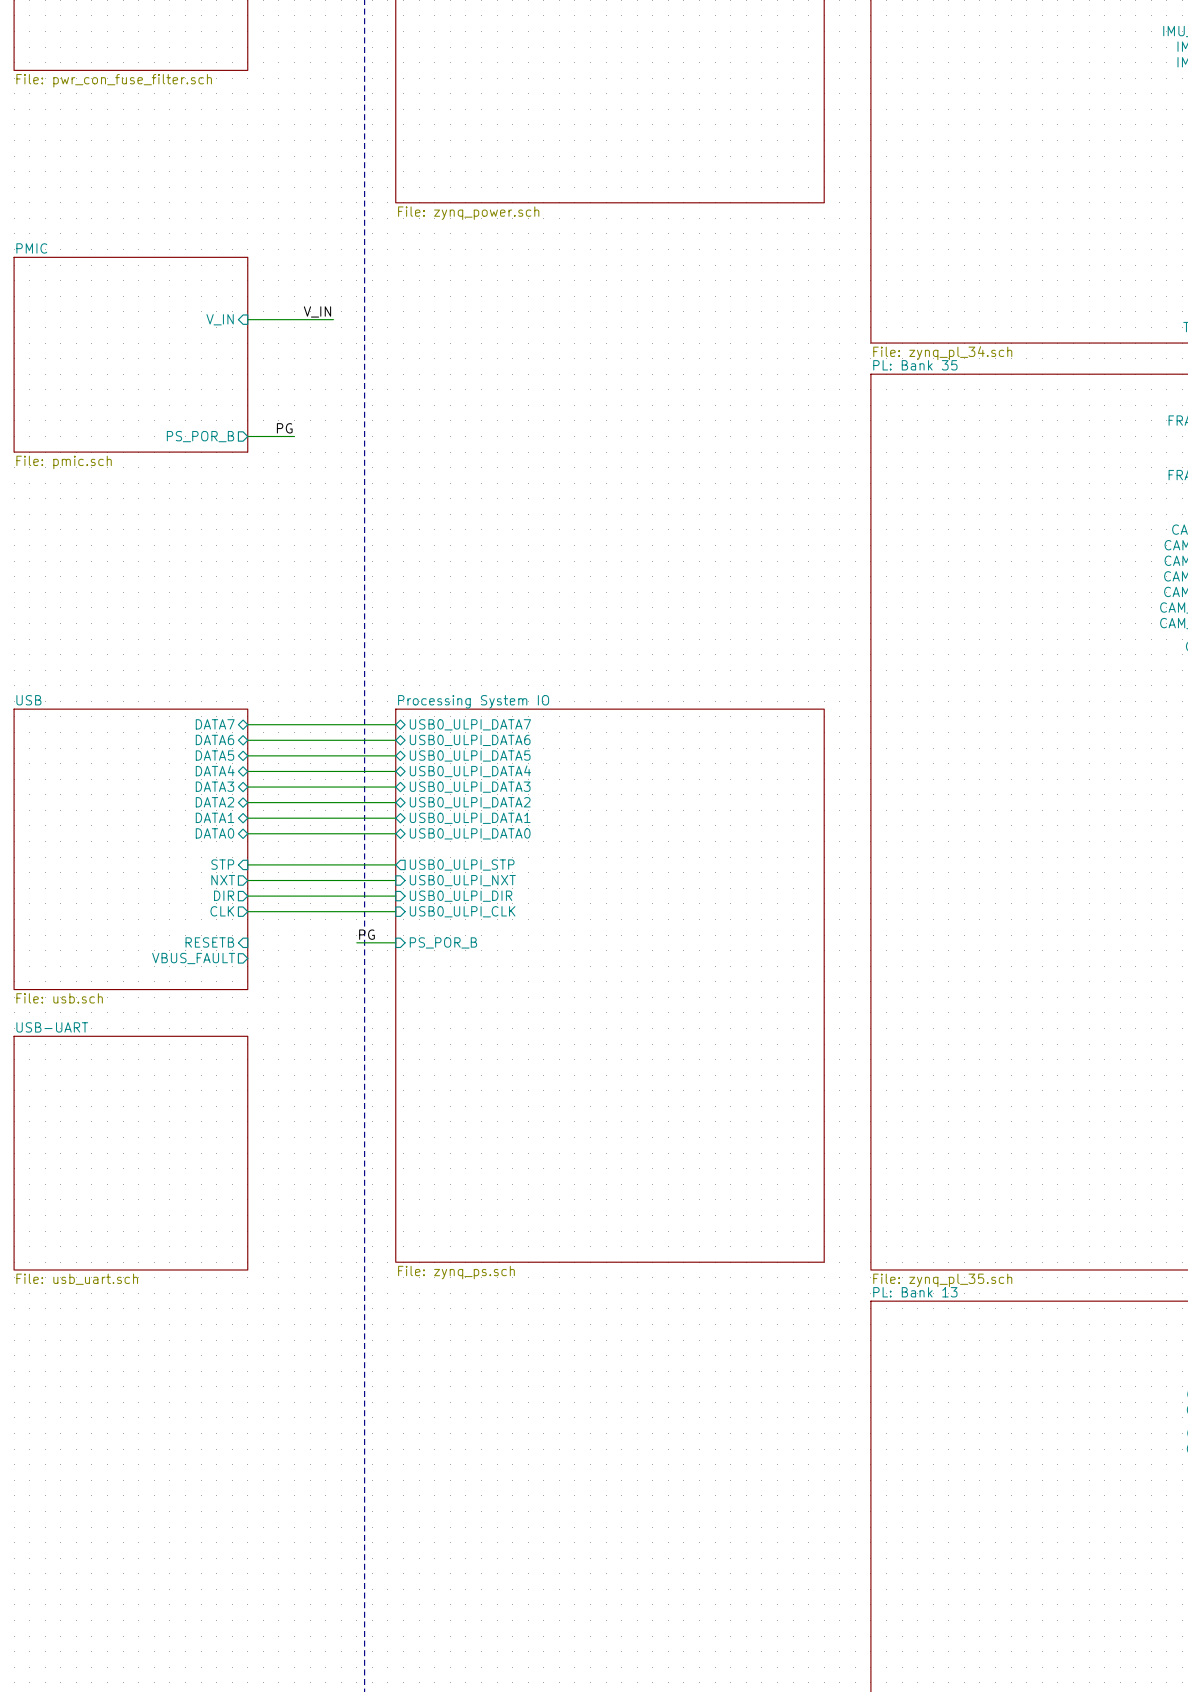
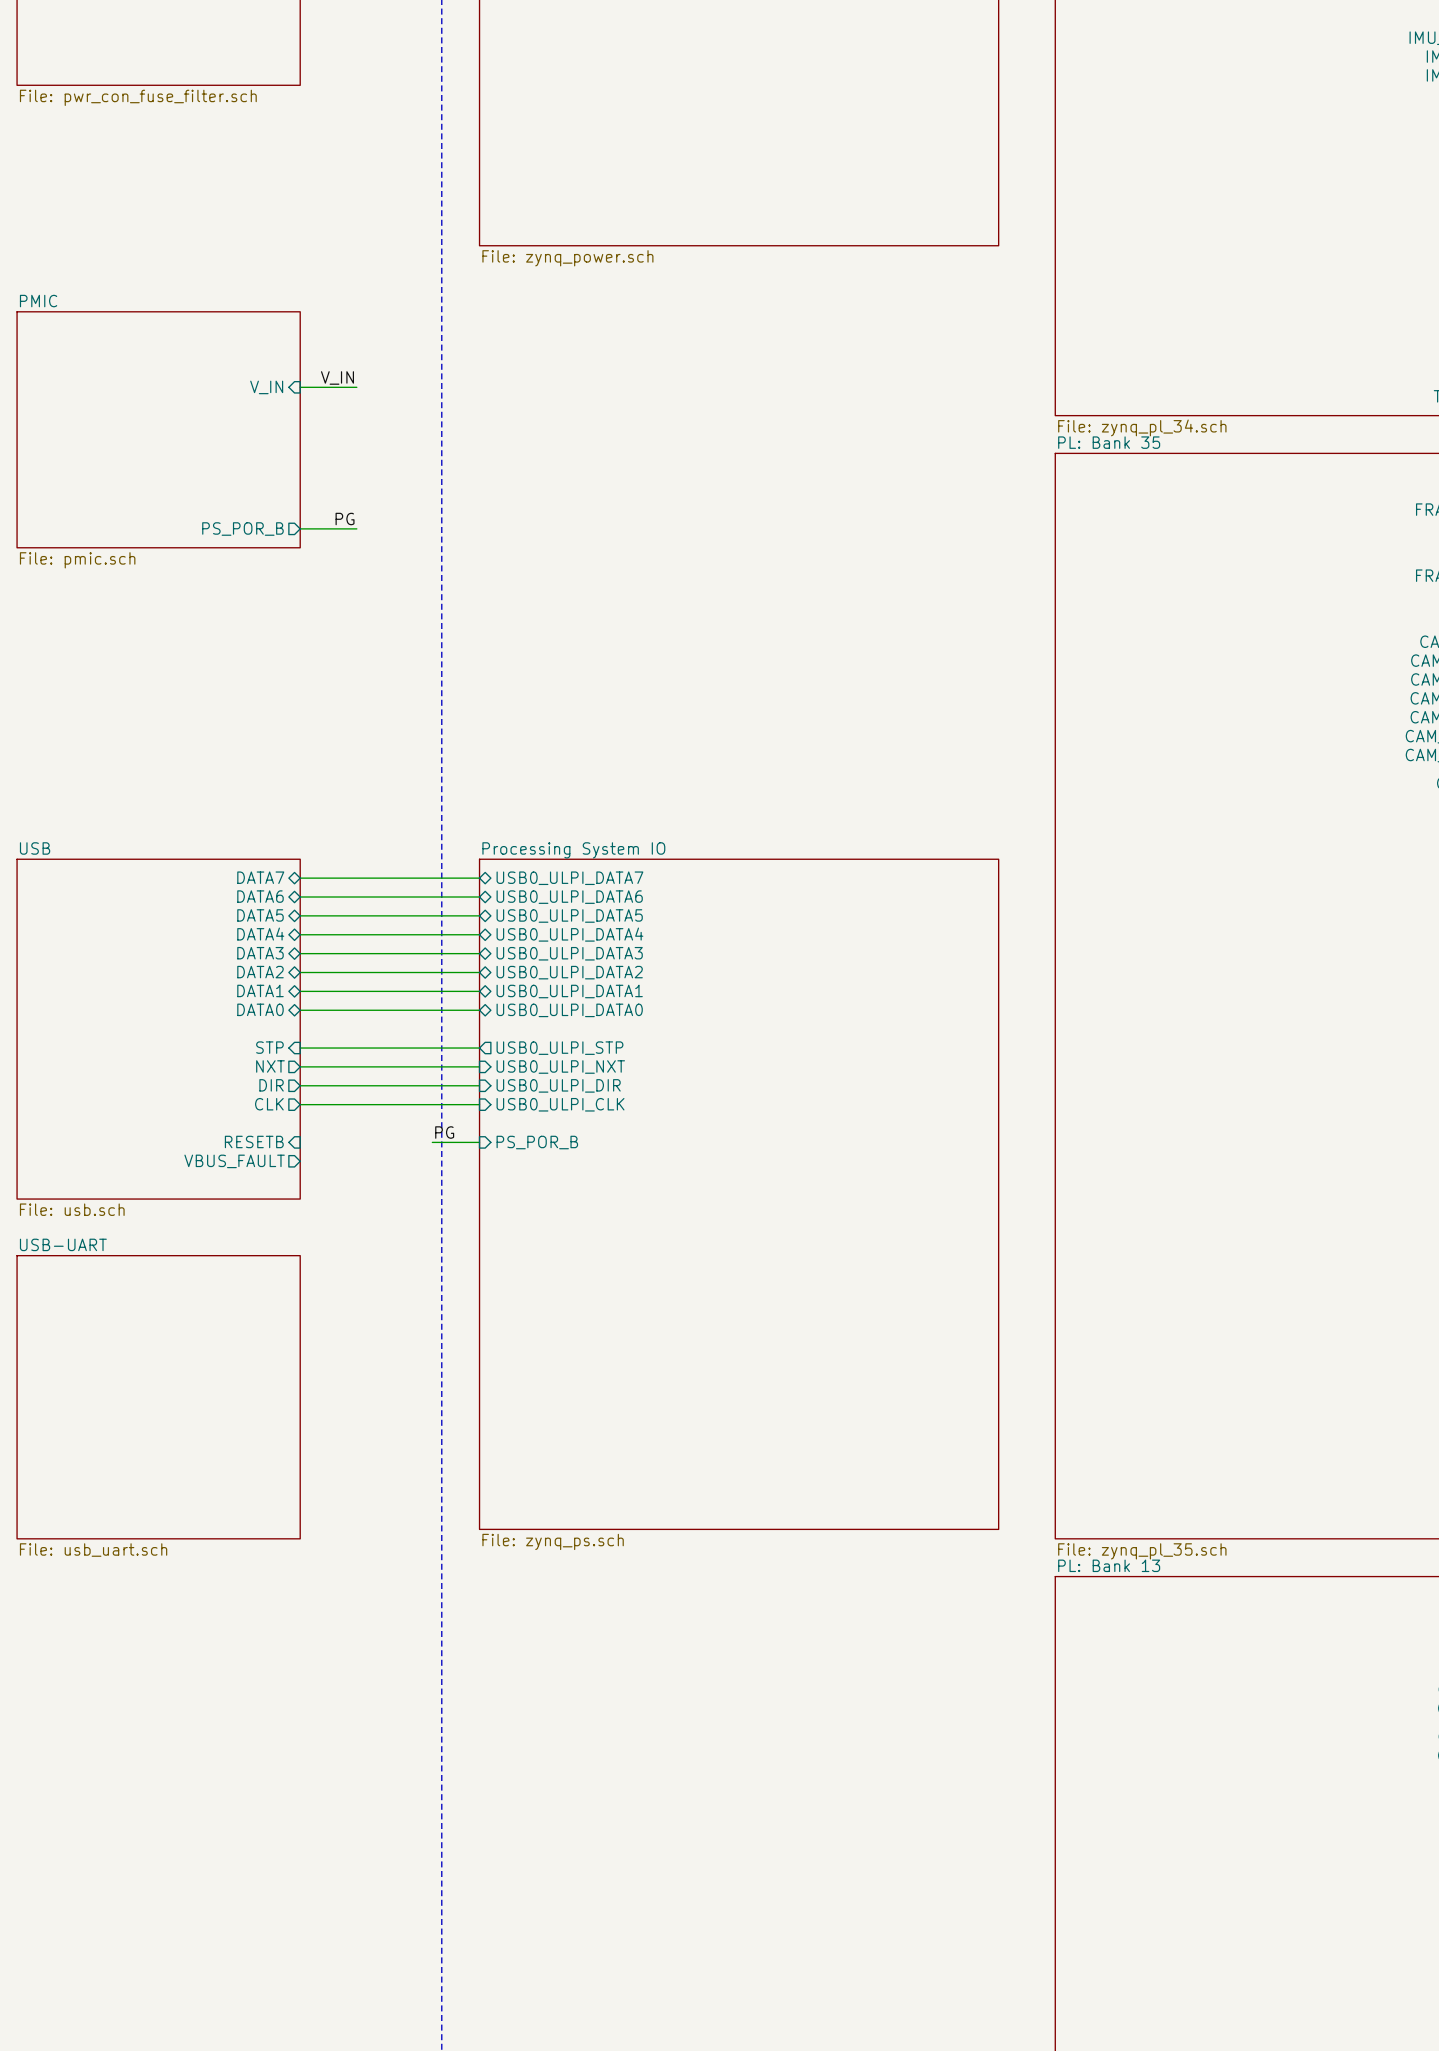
label position: V_IN (317, 311) -> V_IN (337, 377)
wire: (294, 319) (333, 319) -> none

